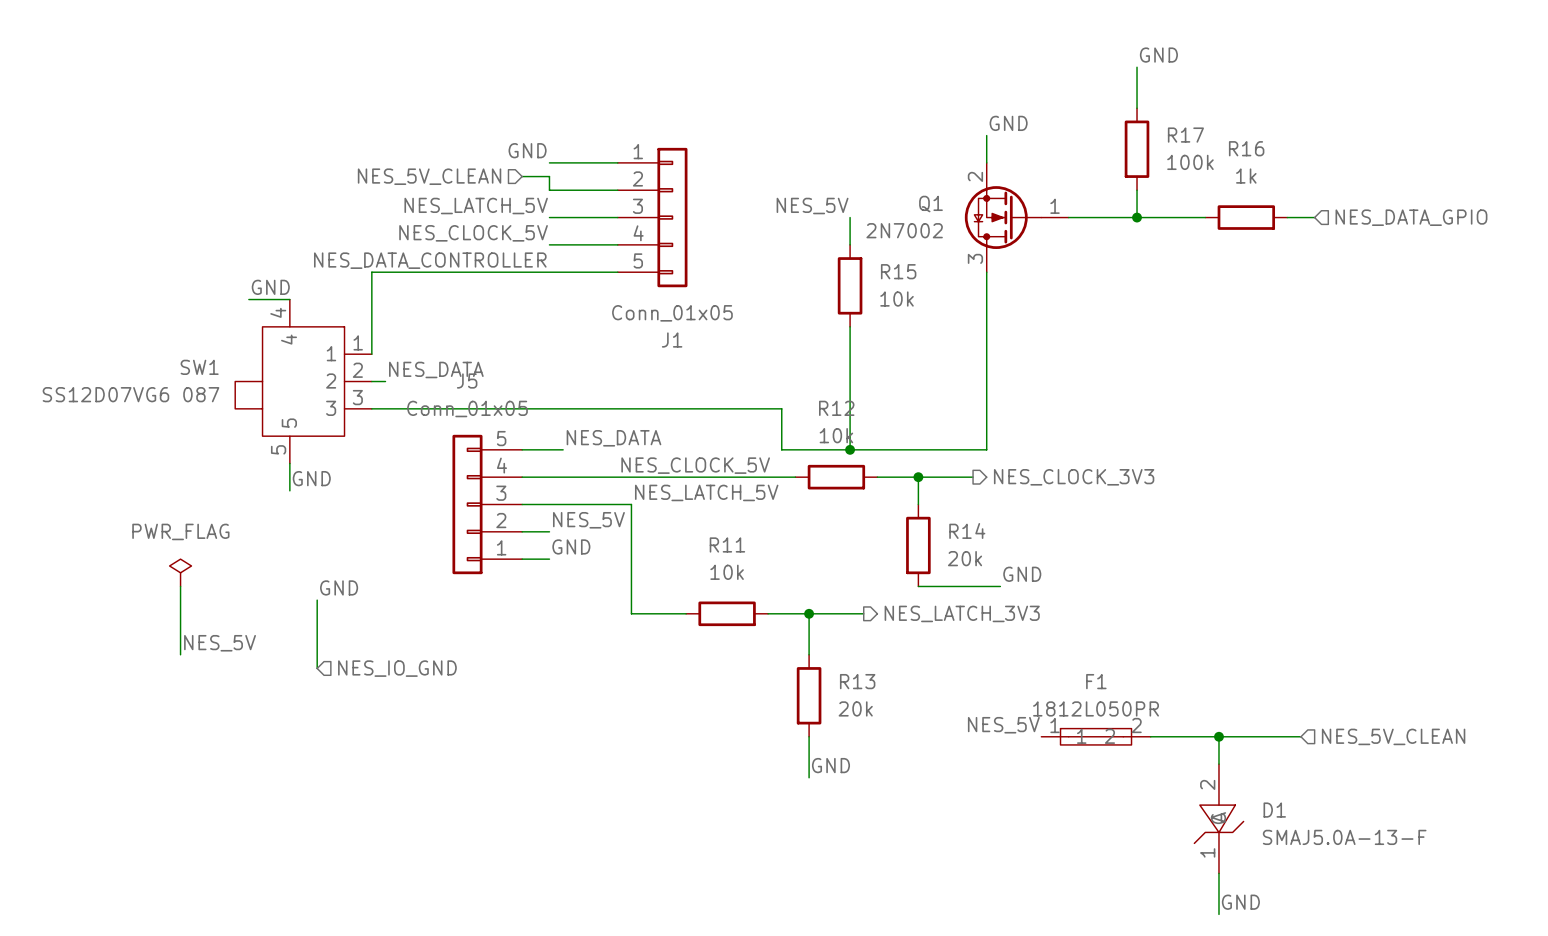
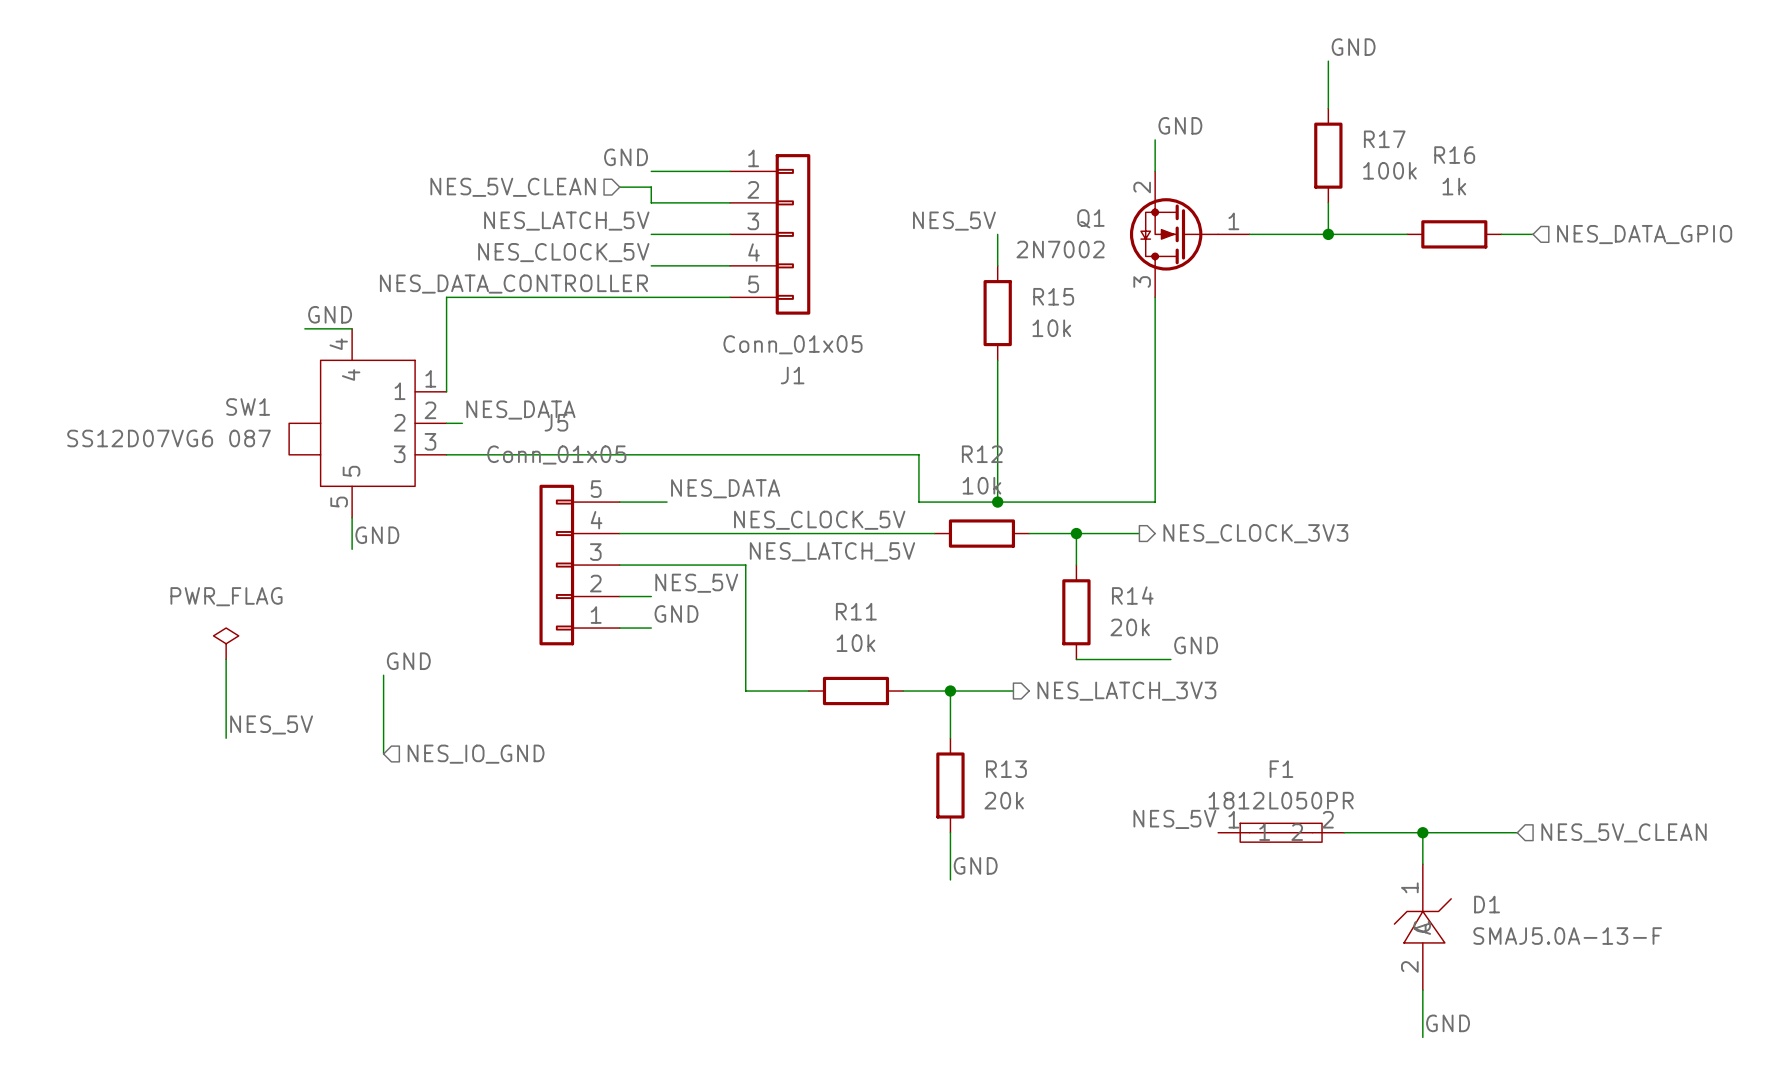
D1 rotation: 0° (1218, 824) -> 180° (1422, 920)

